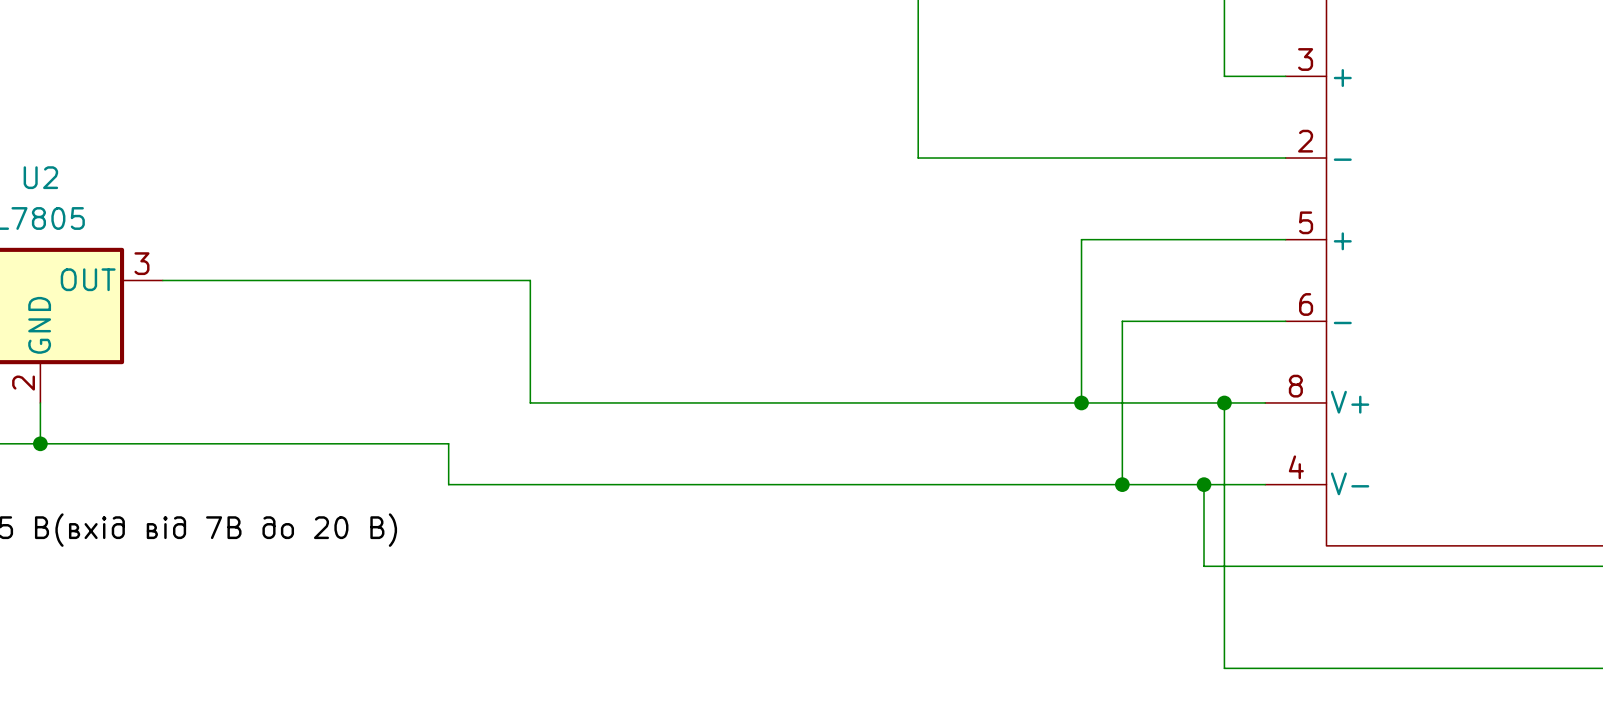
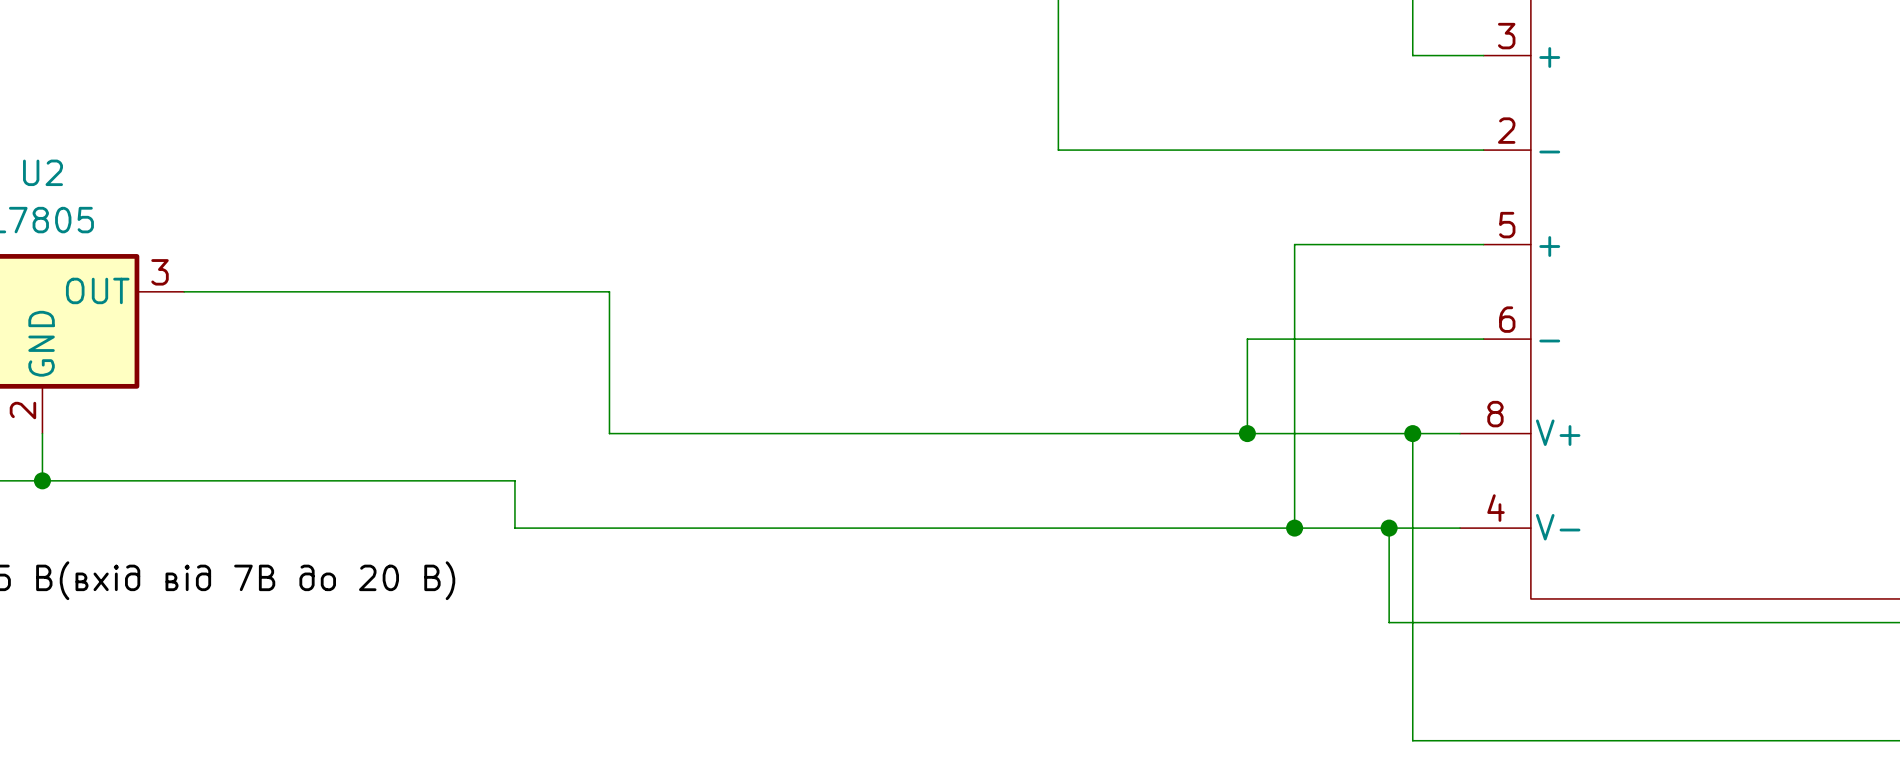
wire: (1122, 239) (1081, 239) (1081, 321) -> (1294, 244) (1294, 339) (1247, 339)

